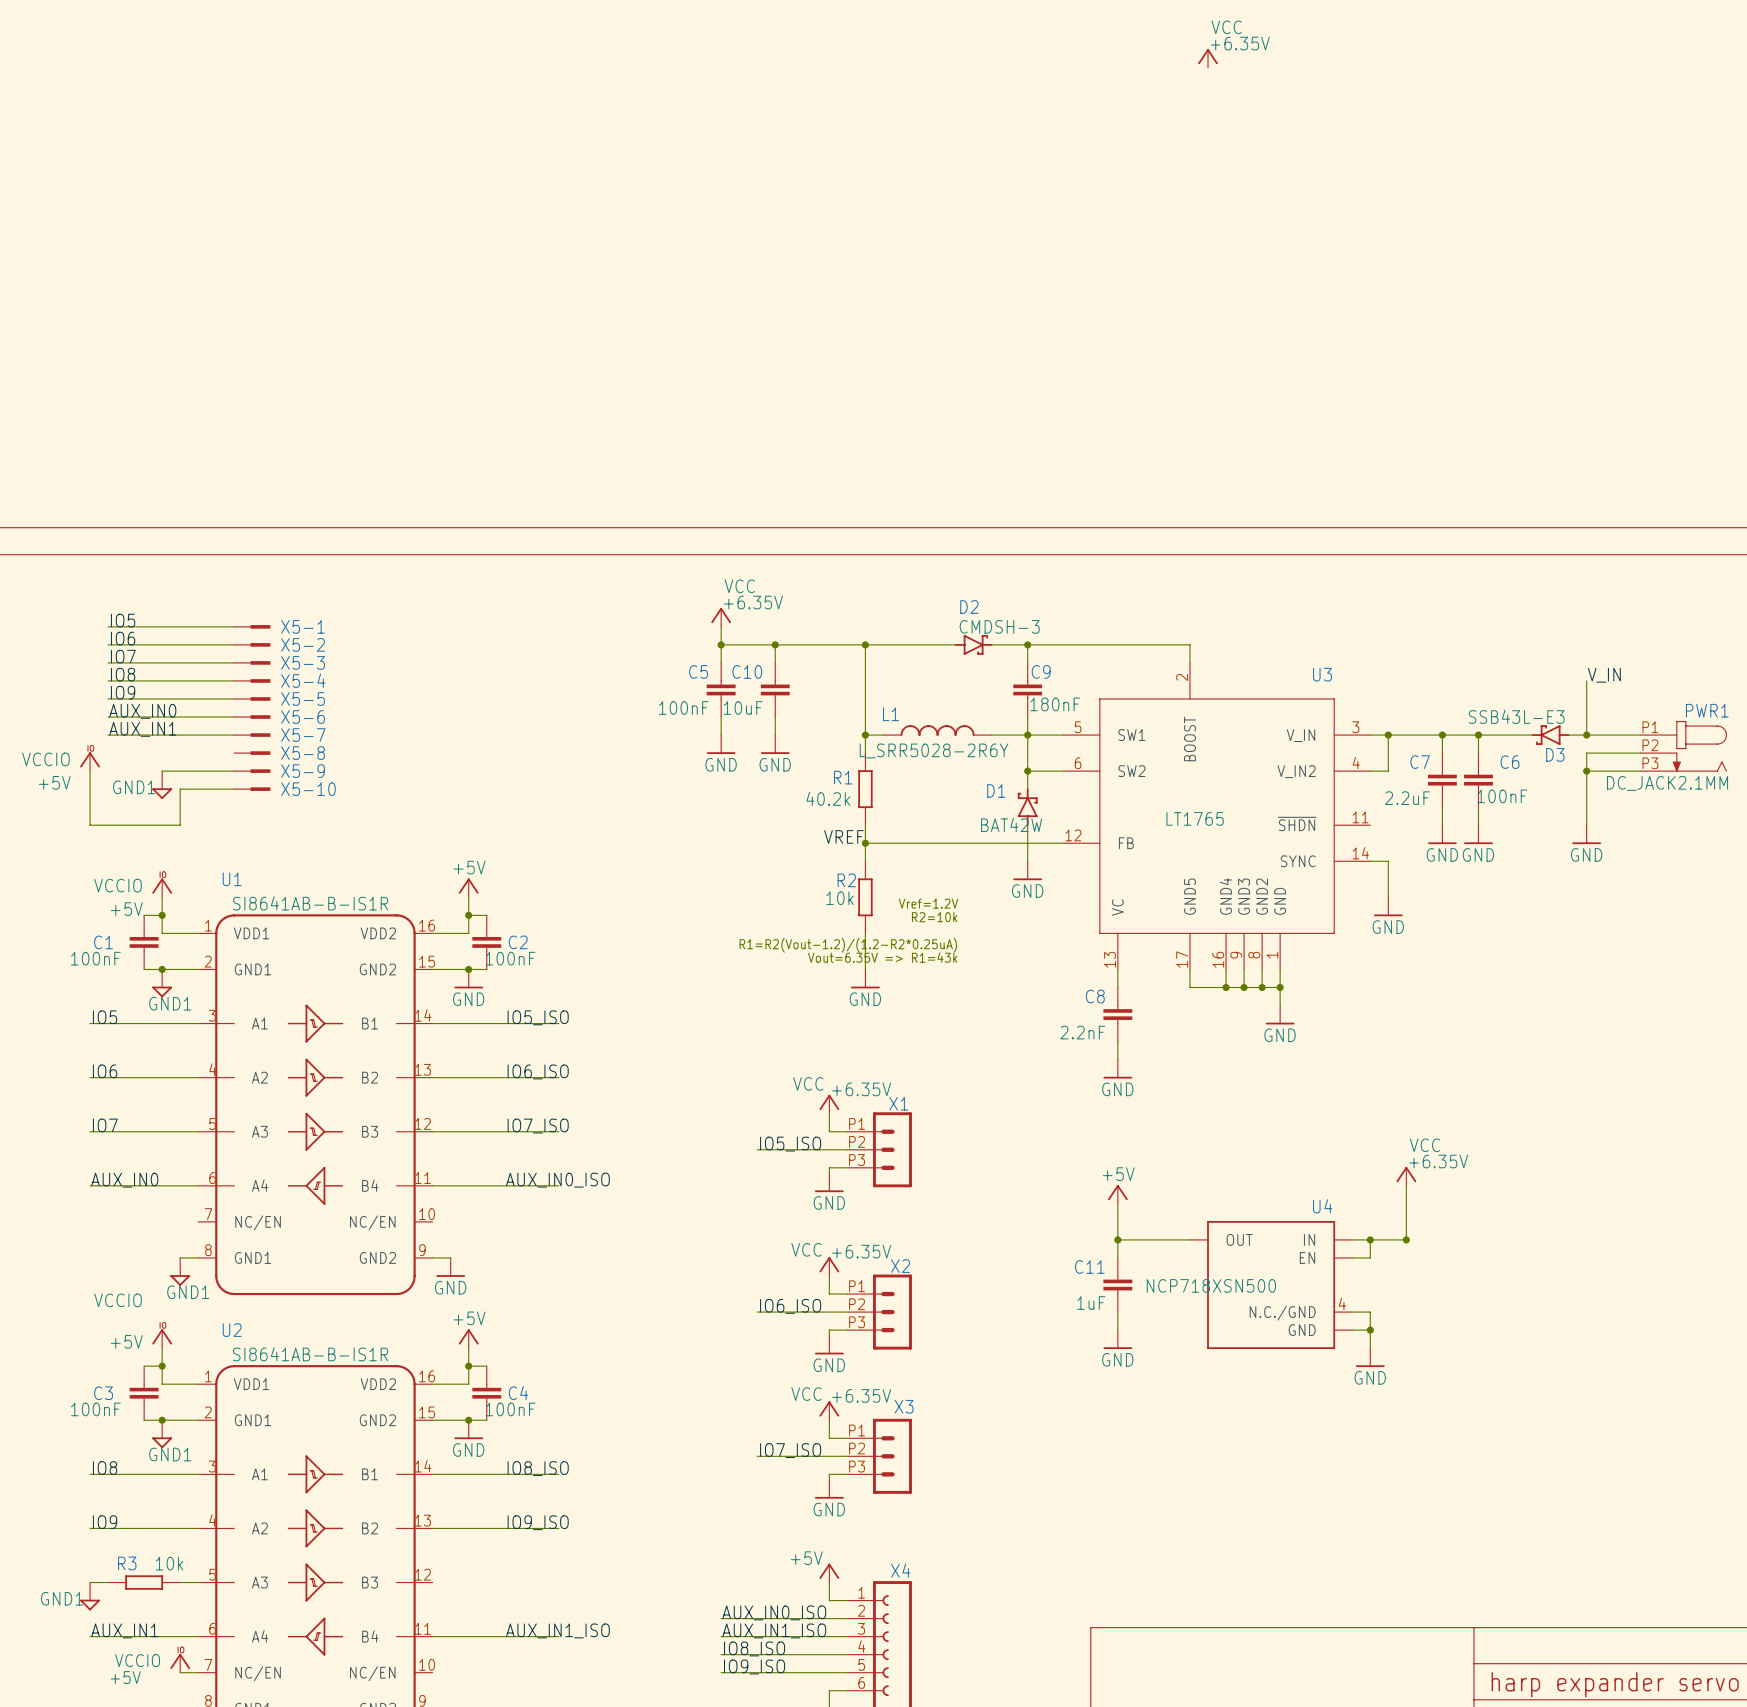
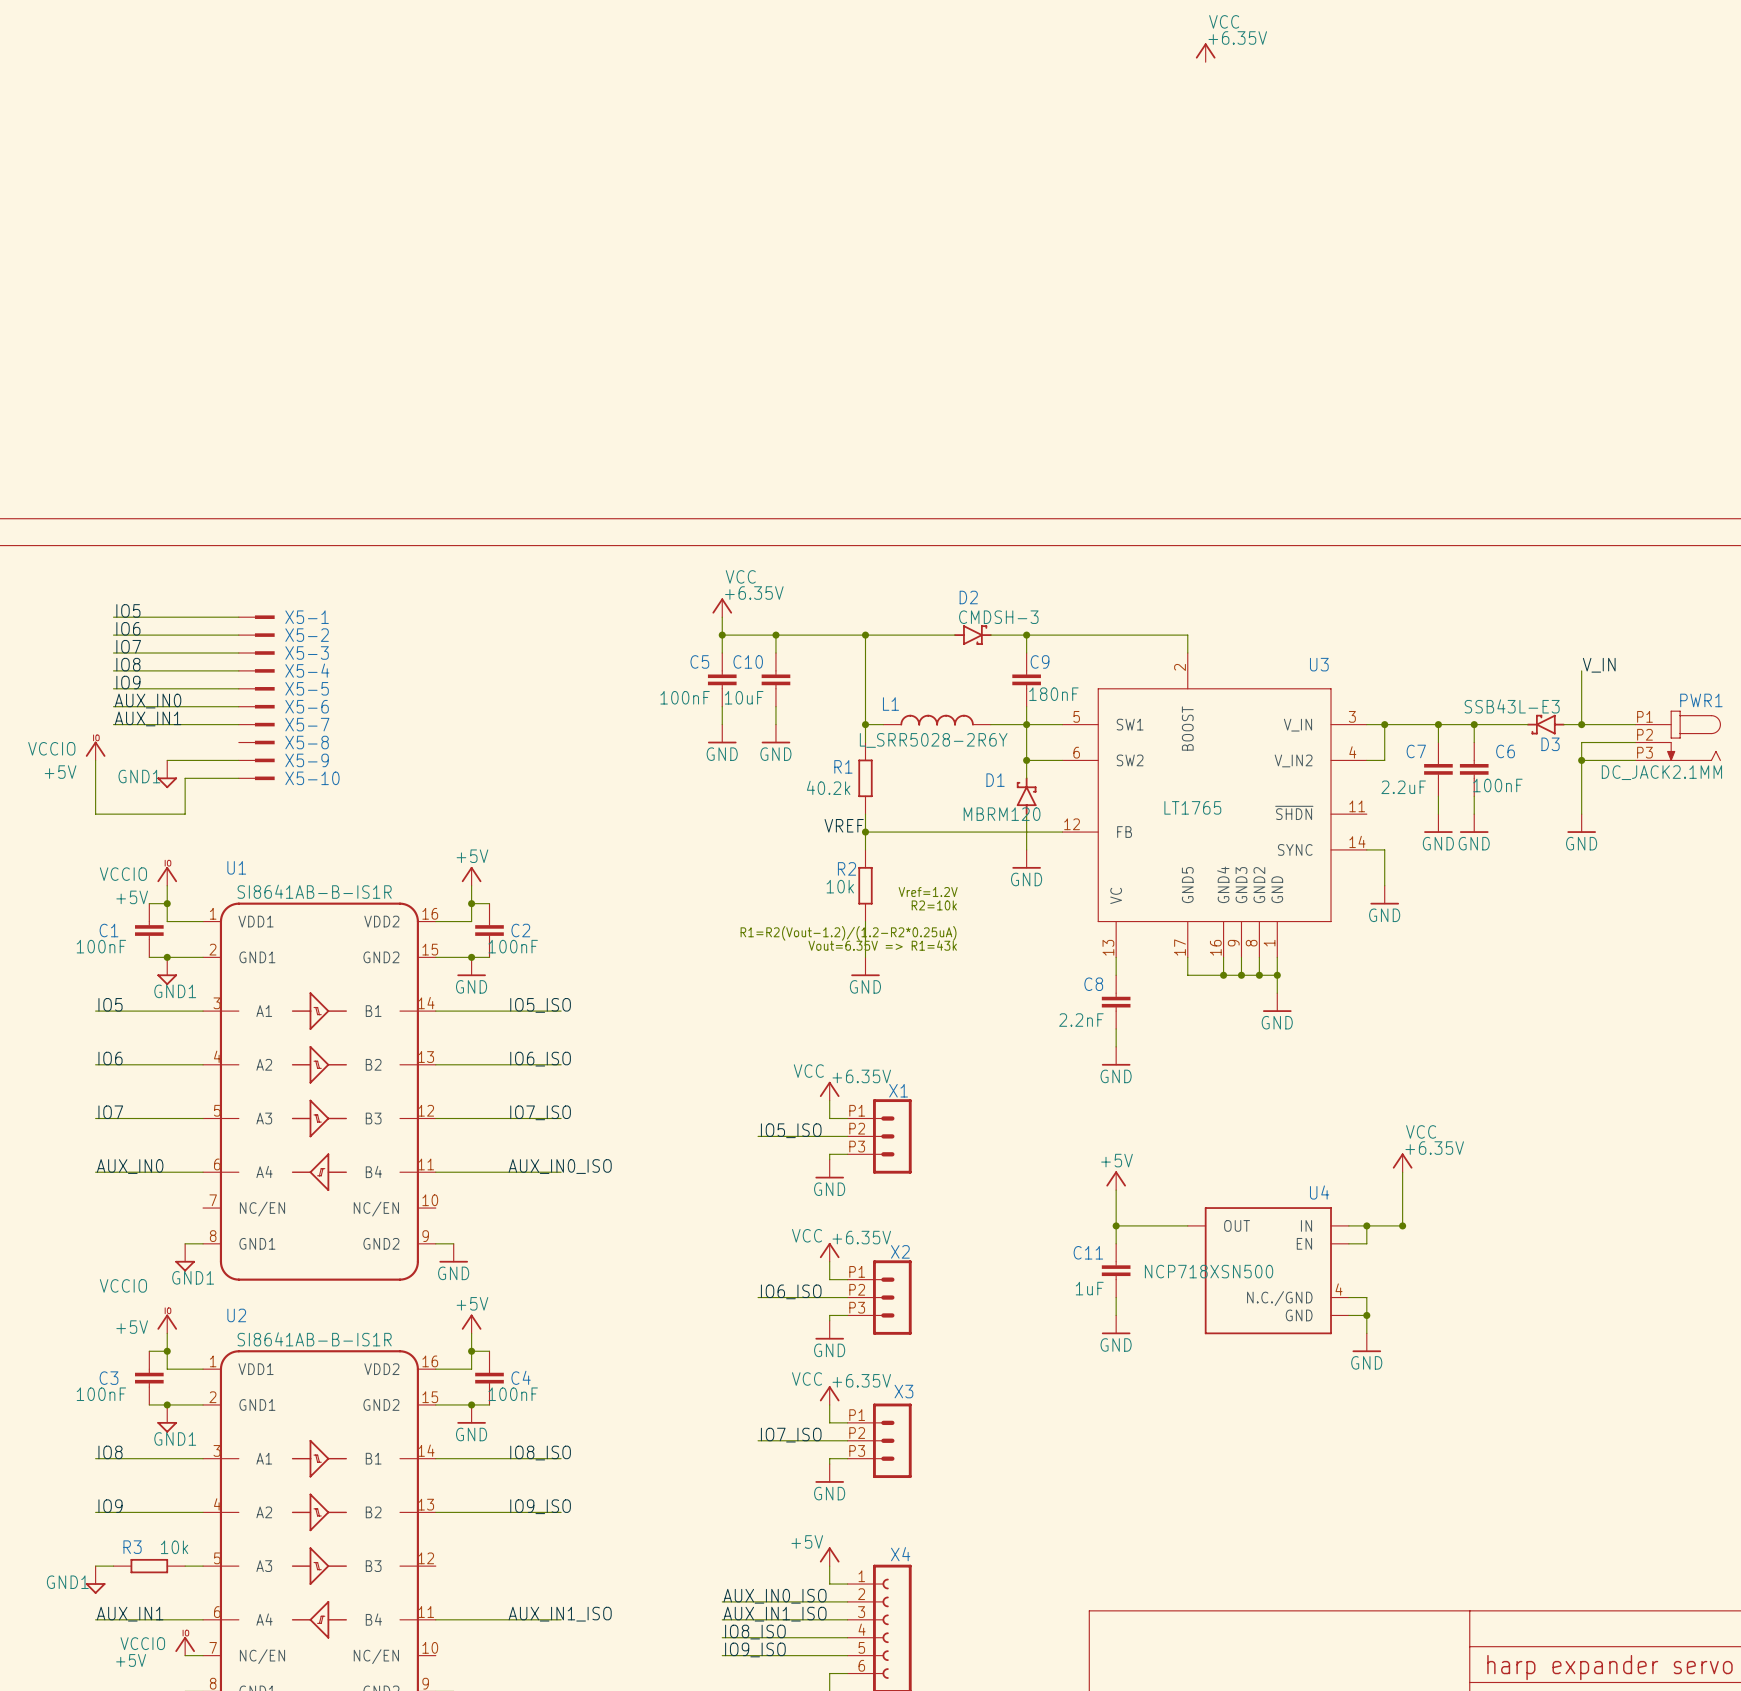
D1 value: BAT42W (1011, 824) -> MBRM120 (1002, 814)

